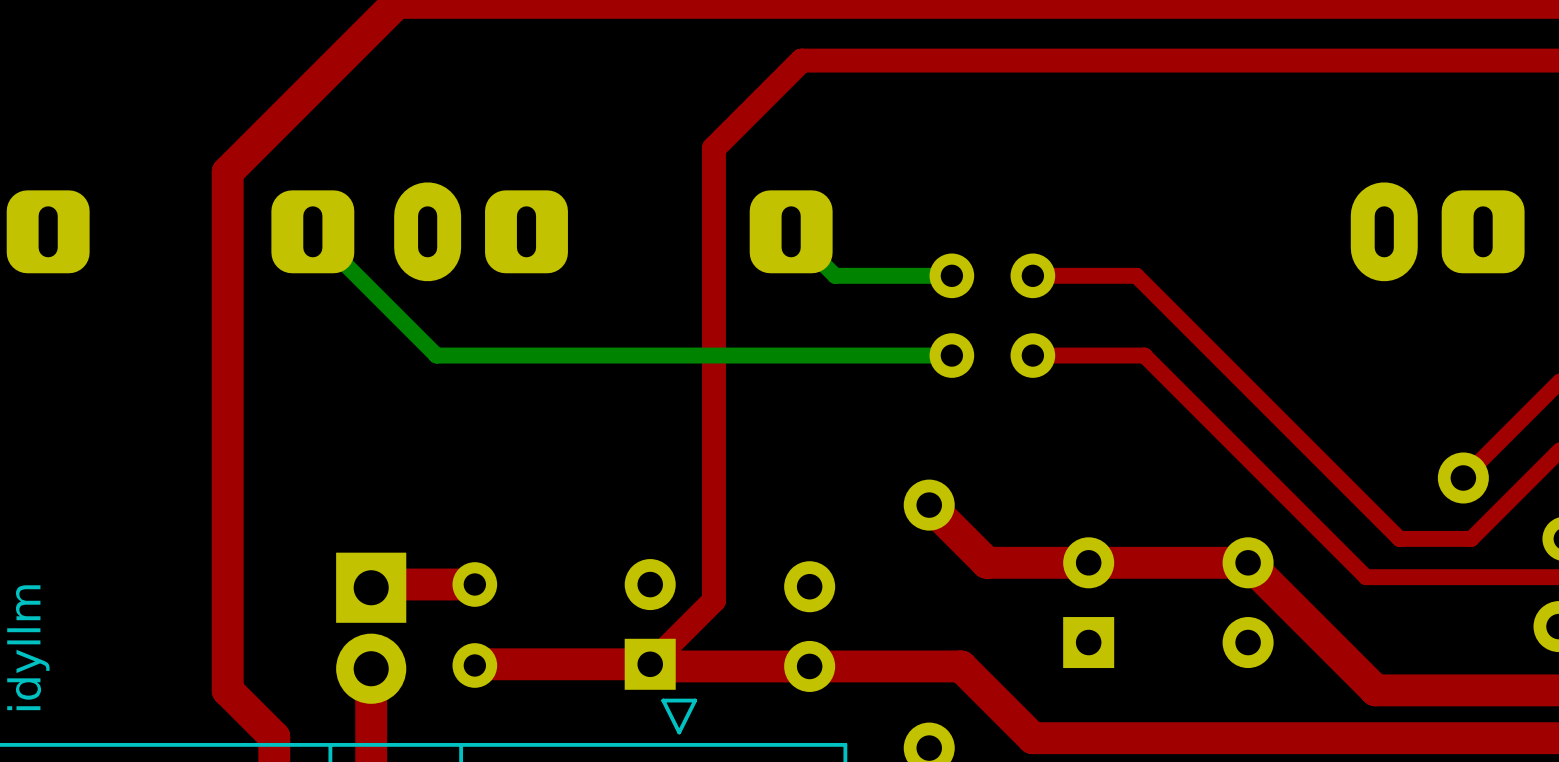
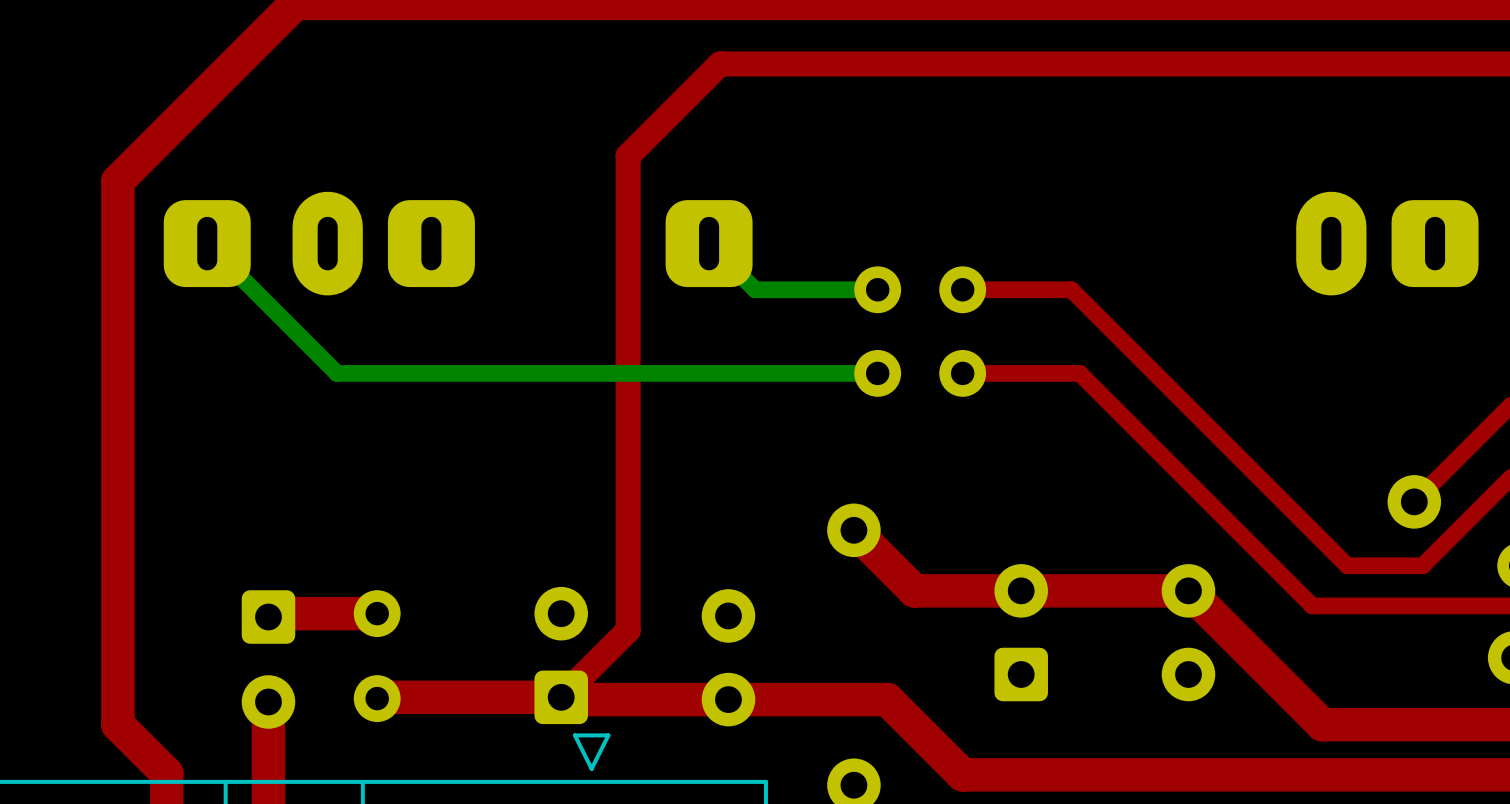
part footprint: [1063, 537, 1115, 669] -> [994, 564, 1048, 702]
part footprint: [336, 552, 407, 704] -> [241, 590, 296, 729]
part footprint: [624, 559, 676, 690] -> [534, 586, 588, 725]

